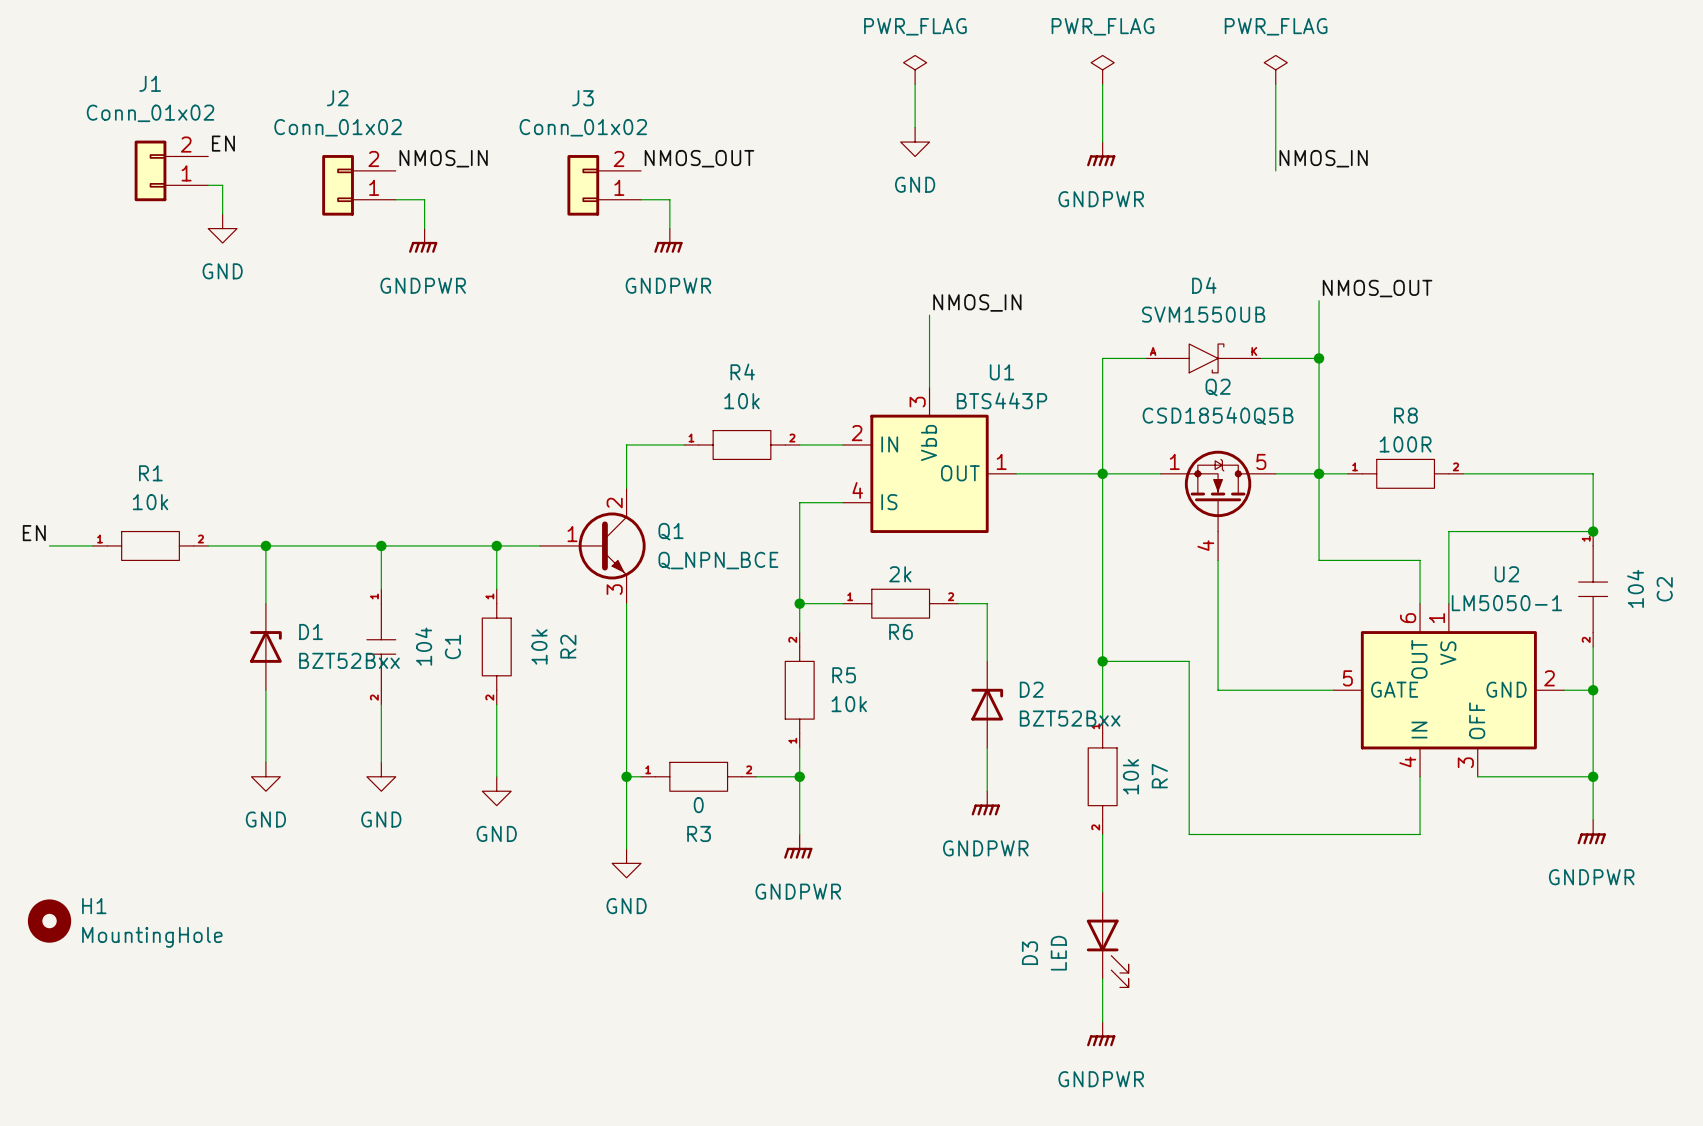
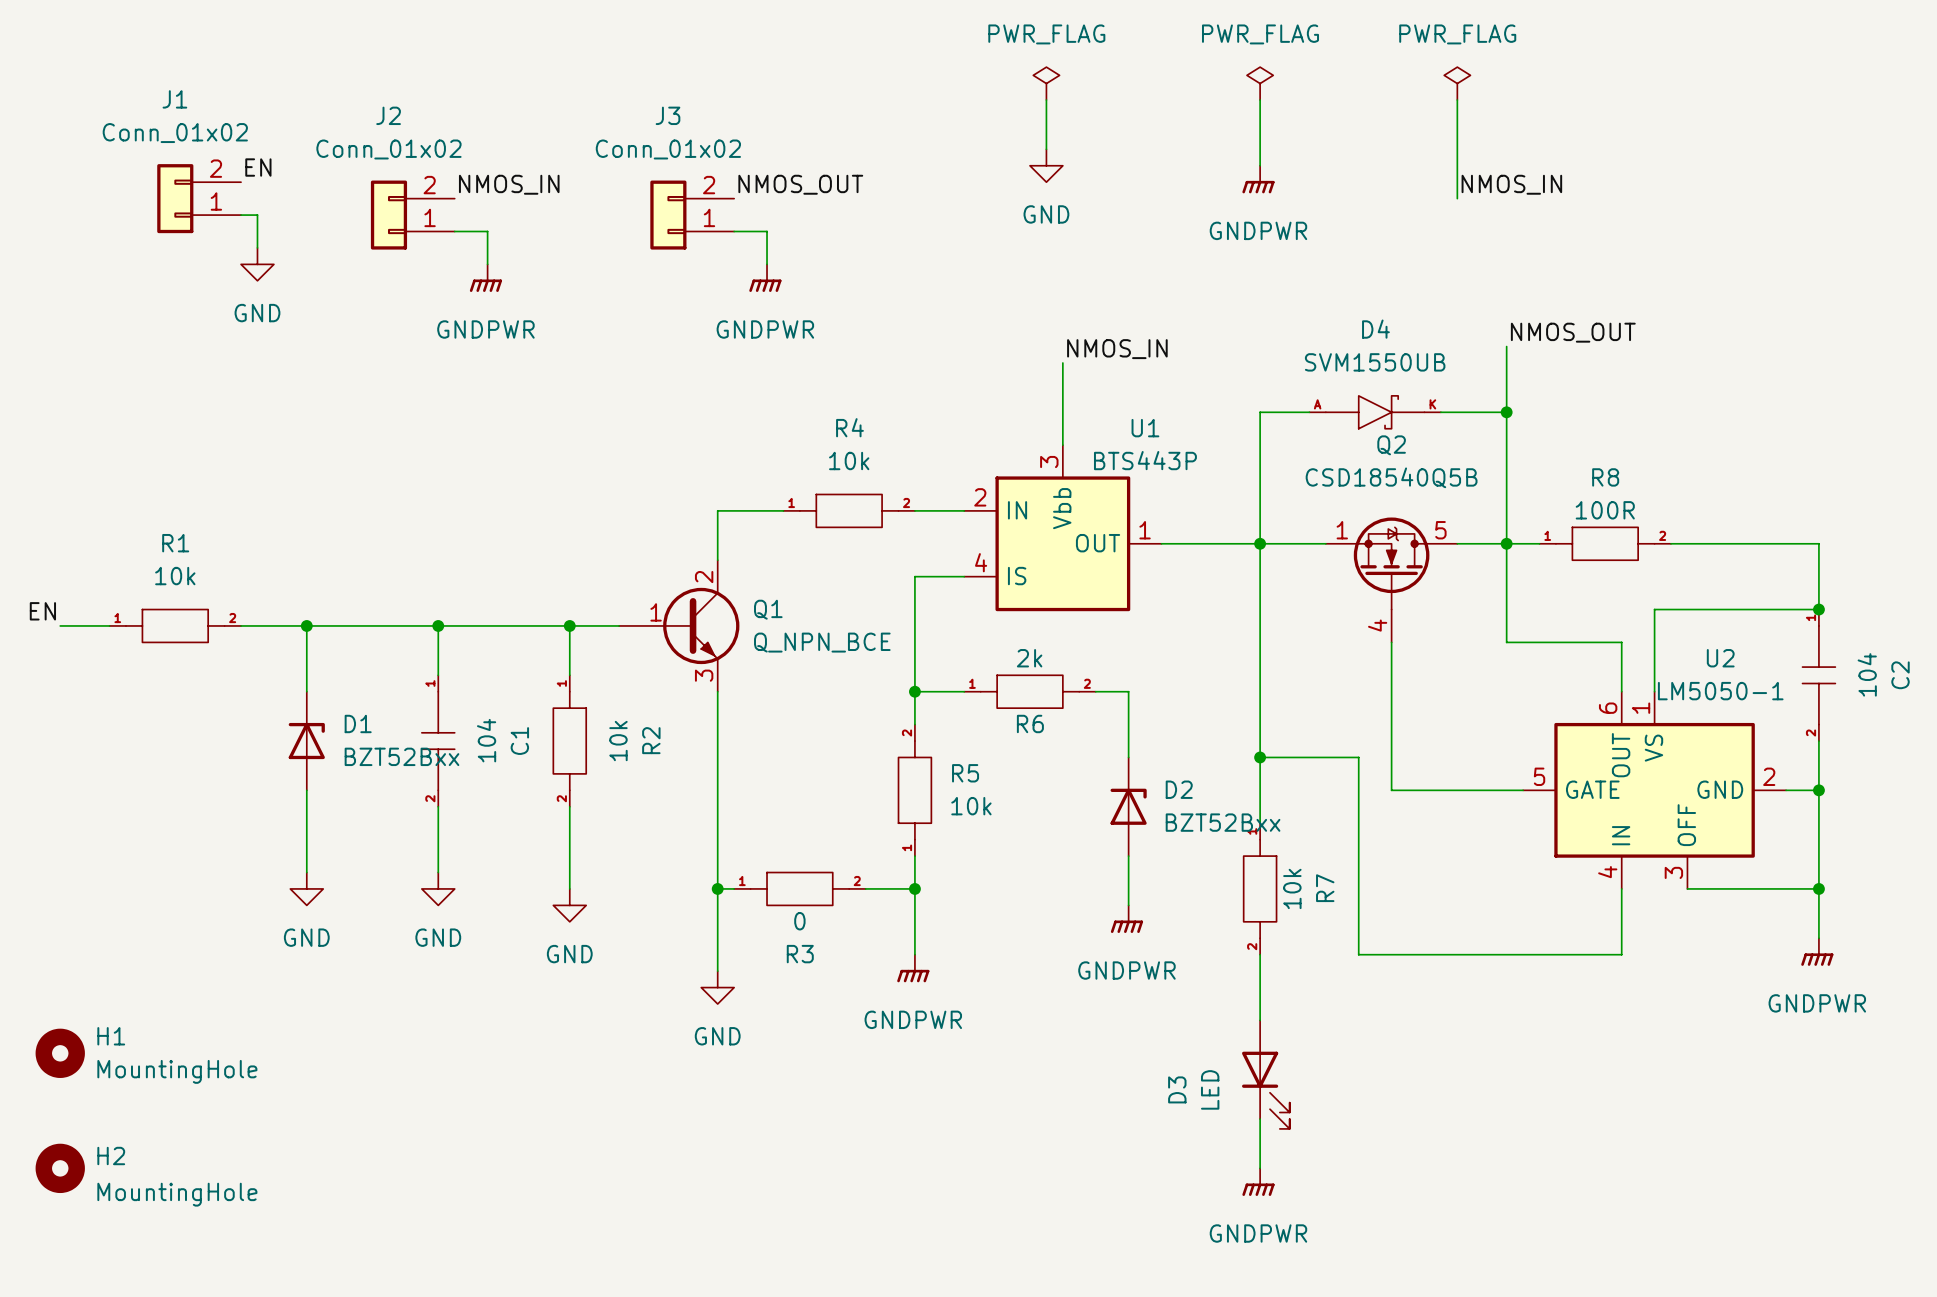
H2: none -> MountingHole (60, 1168)

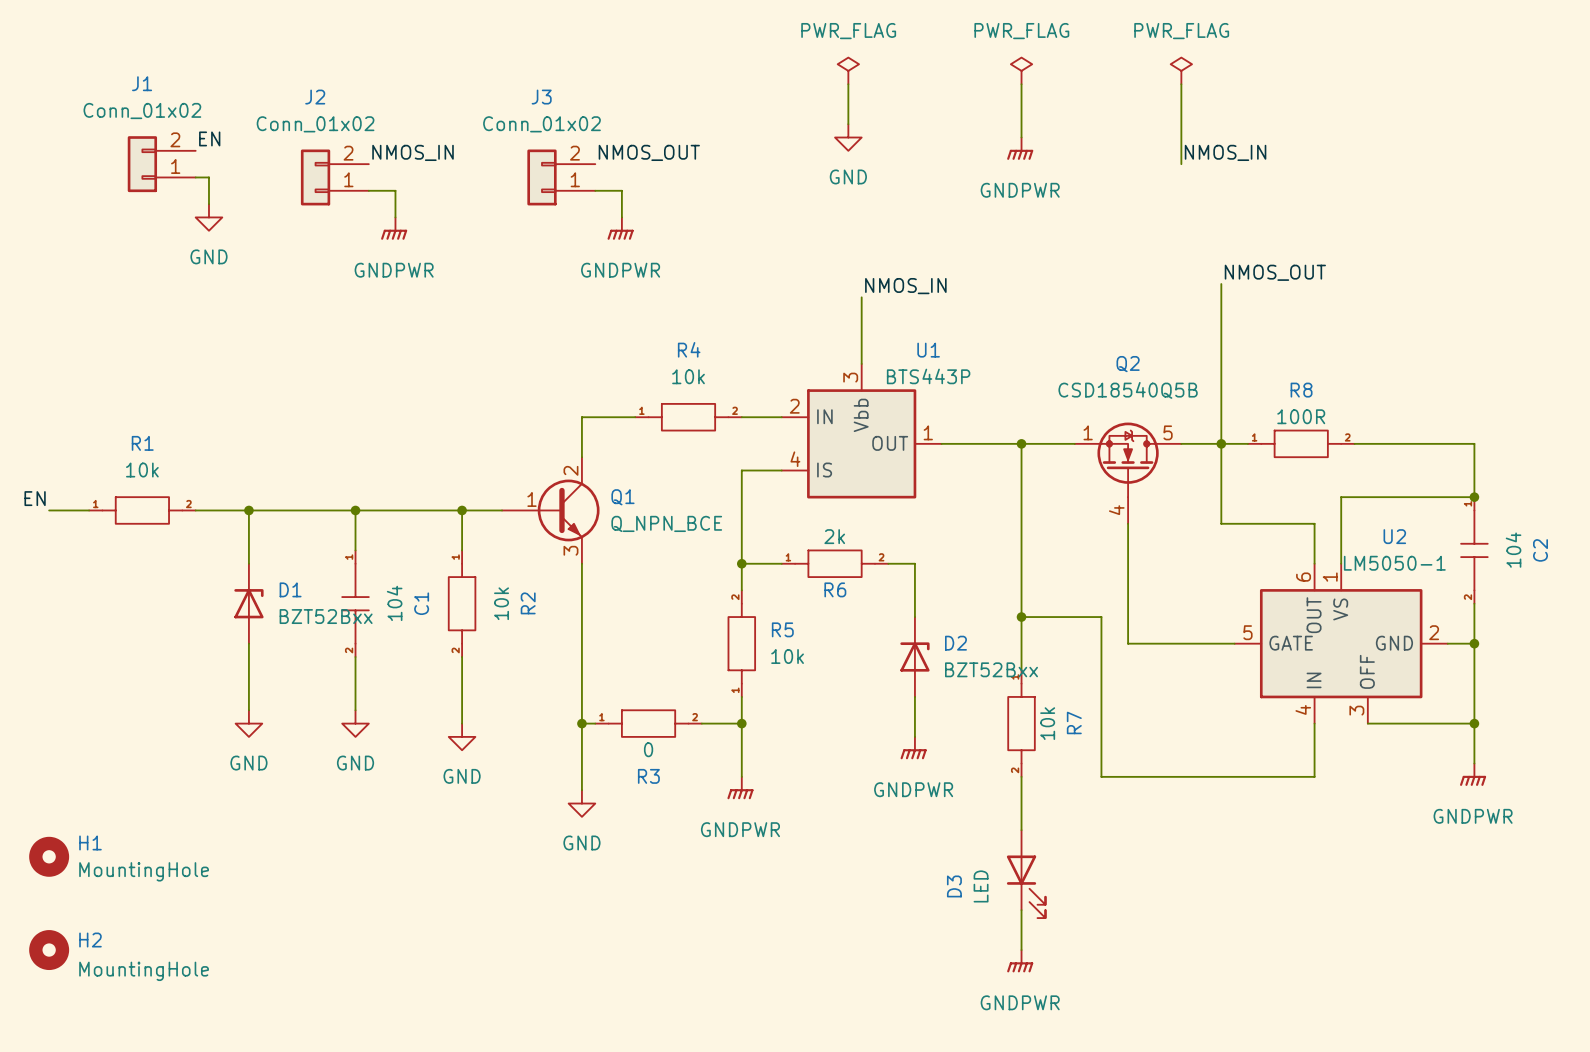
wire: (1309, 412) (1260, 412) (1260, 543) -> none
D4: SVM1550UB (1375, 412) -> none
wire: (1440, 412) (1506, 412) -> none
junction: (1506, 412) -> none

